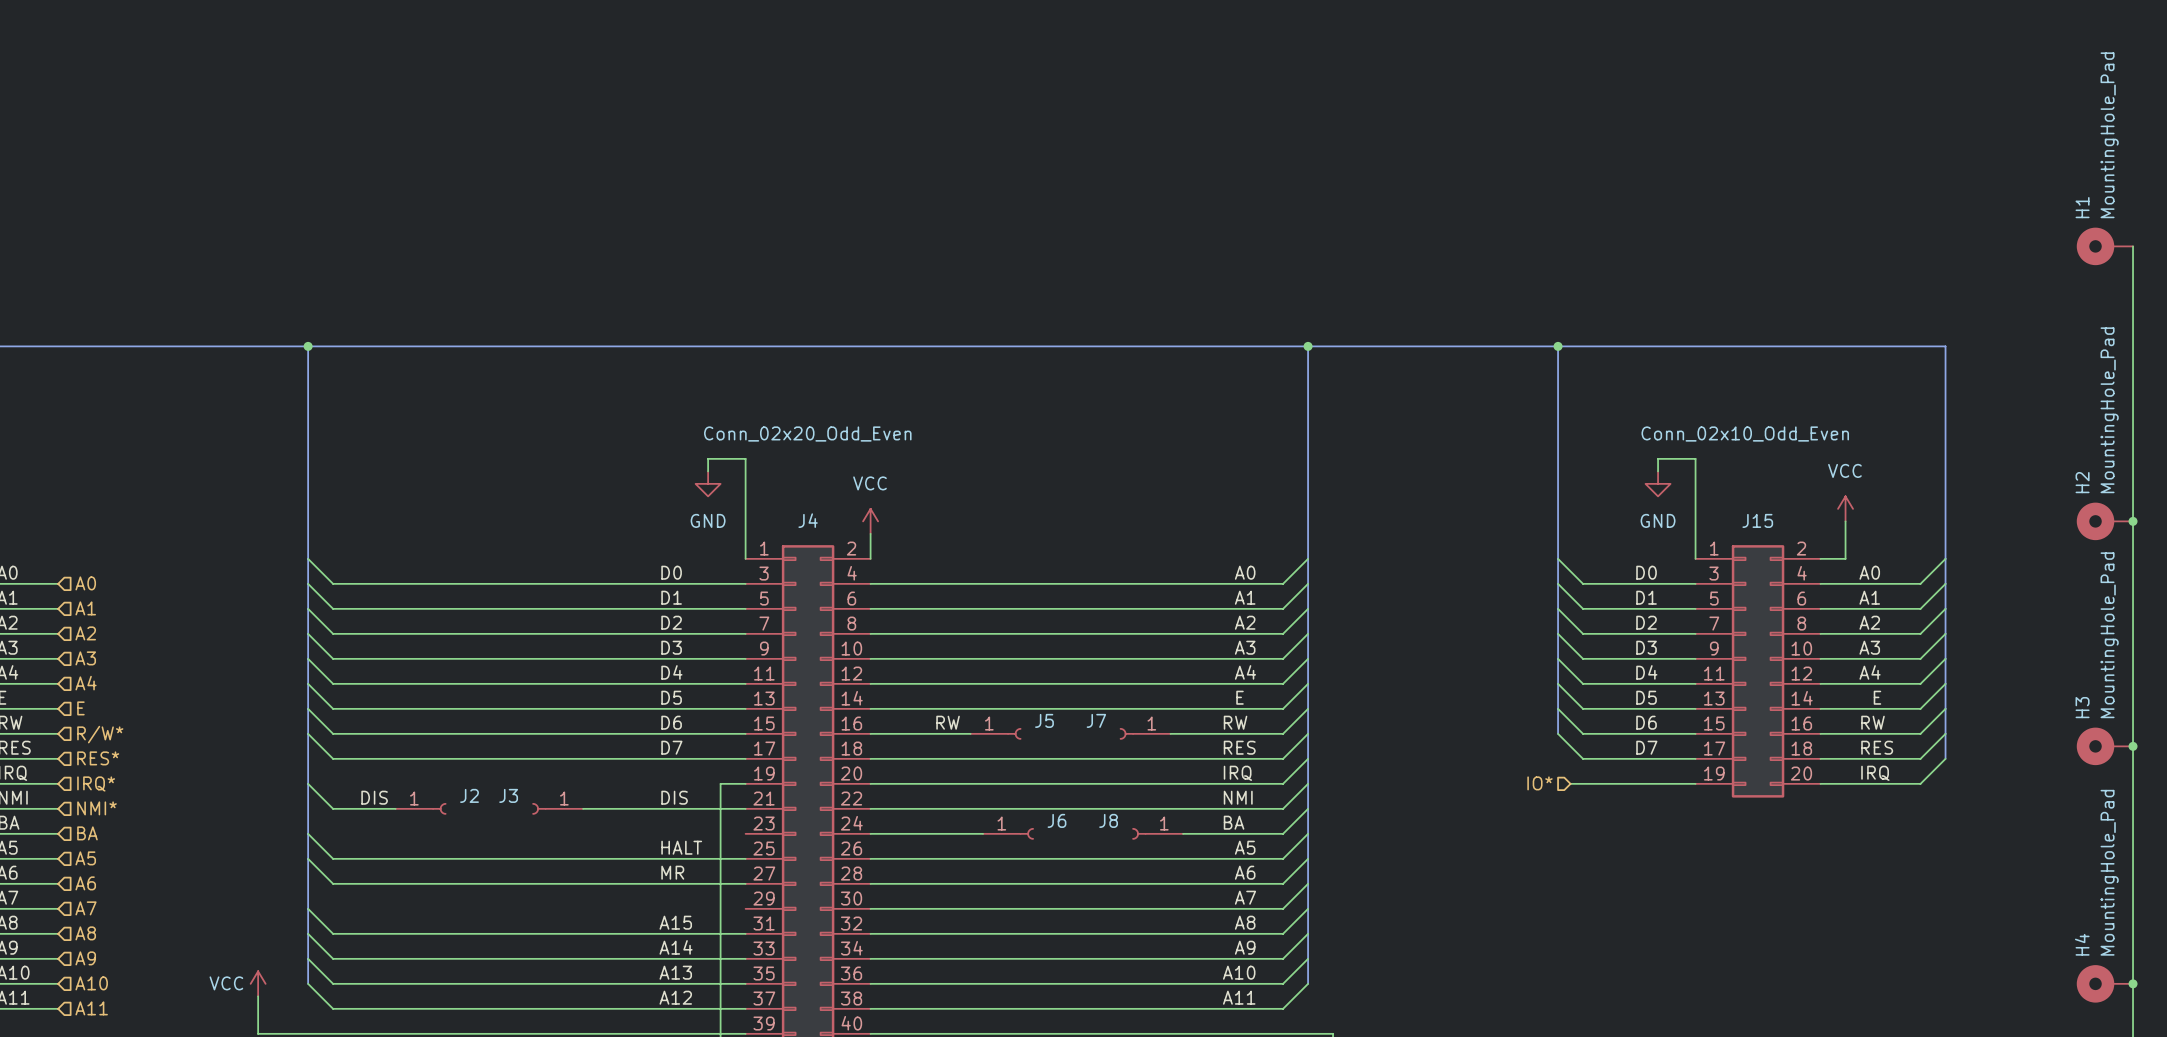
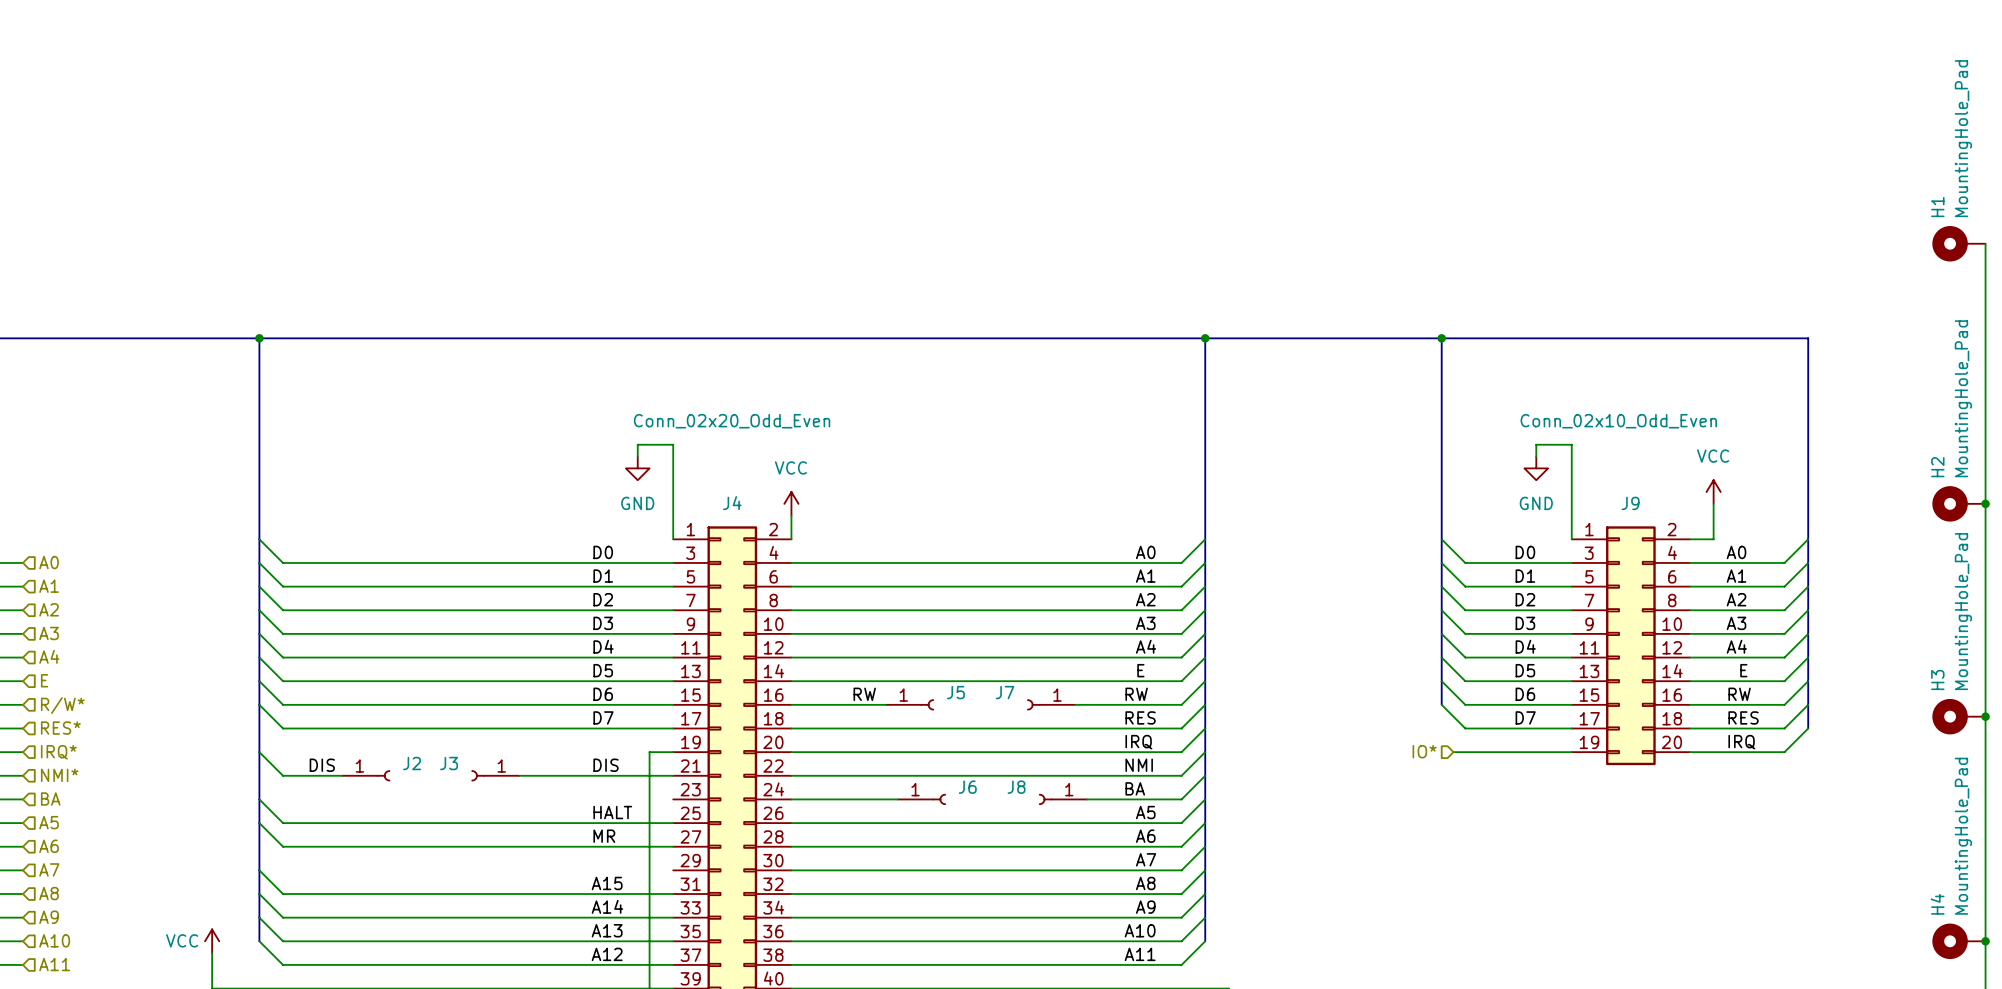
J15 name: J15 (1757, 520) -> J9 (1630, 503)

